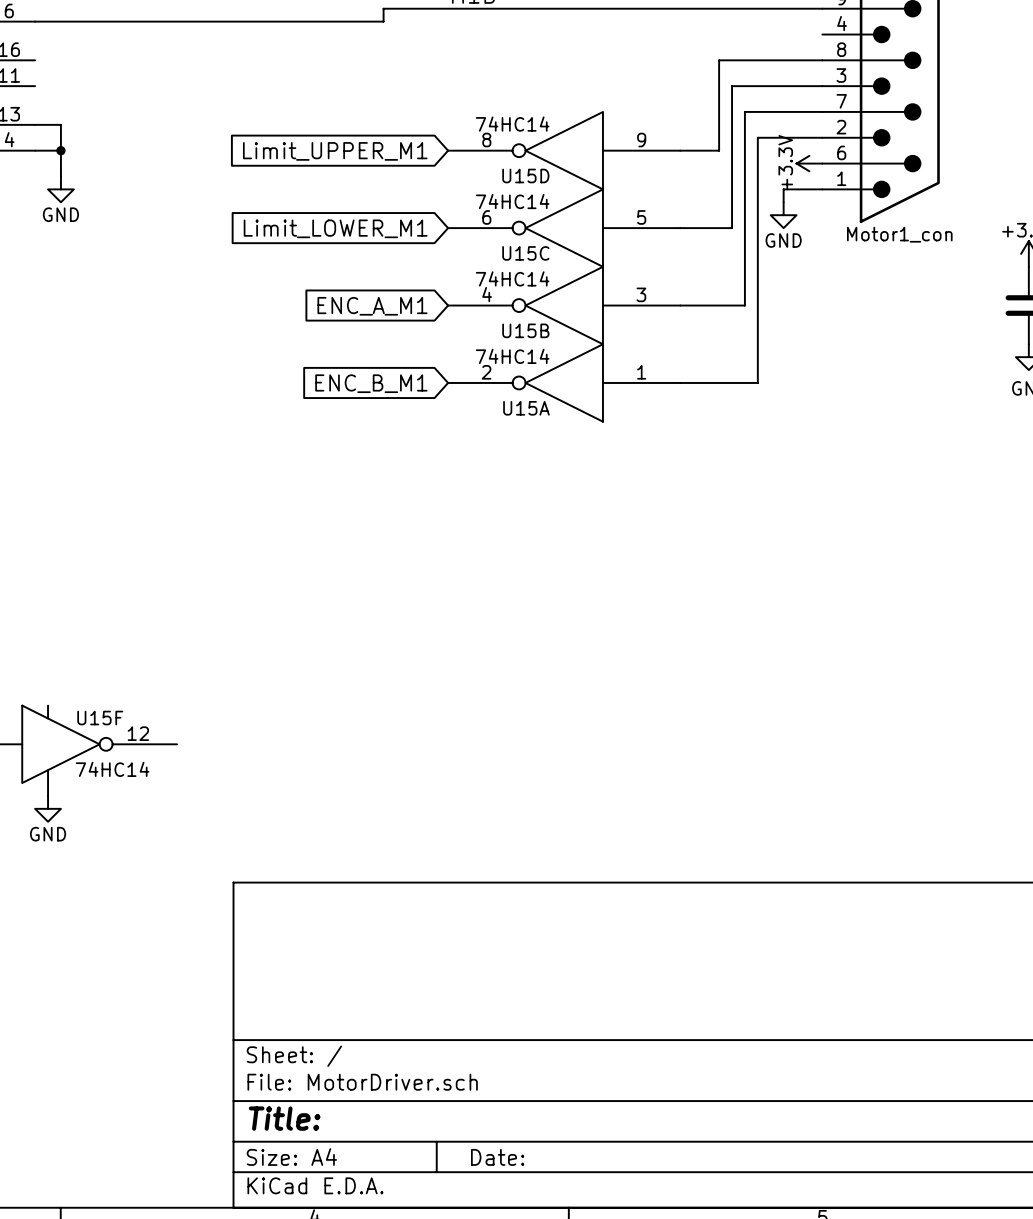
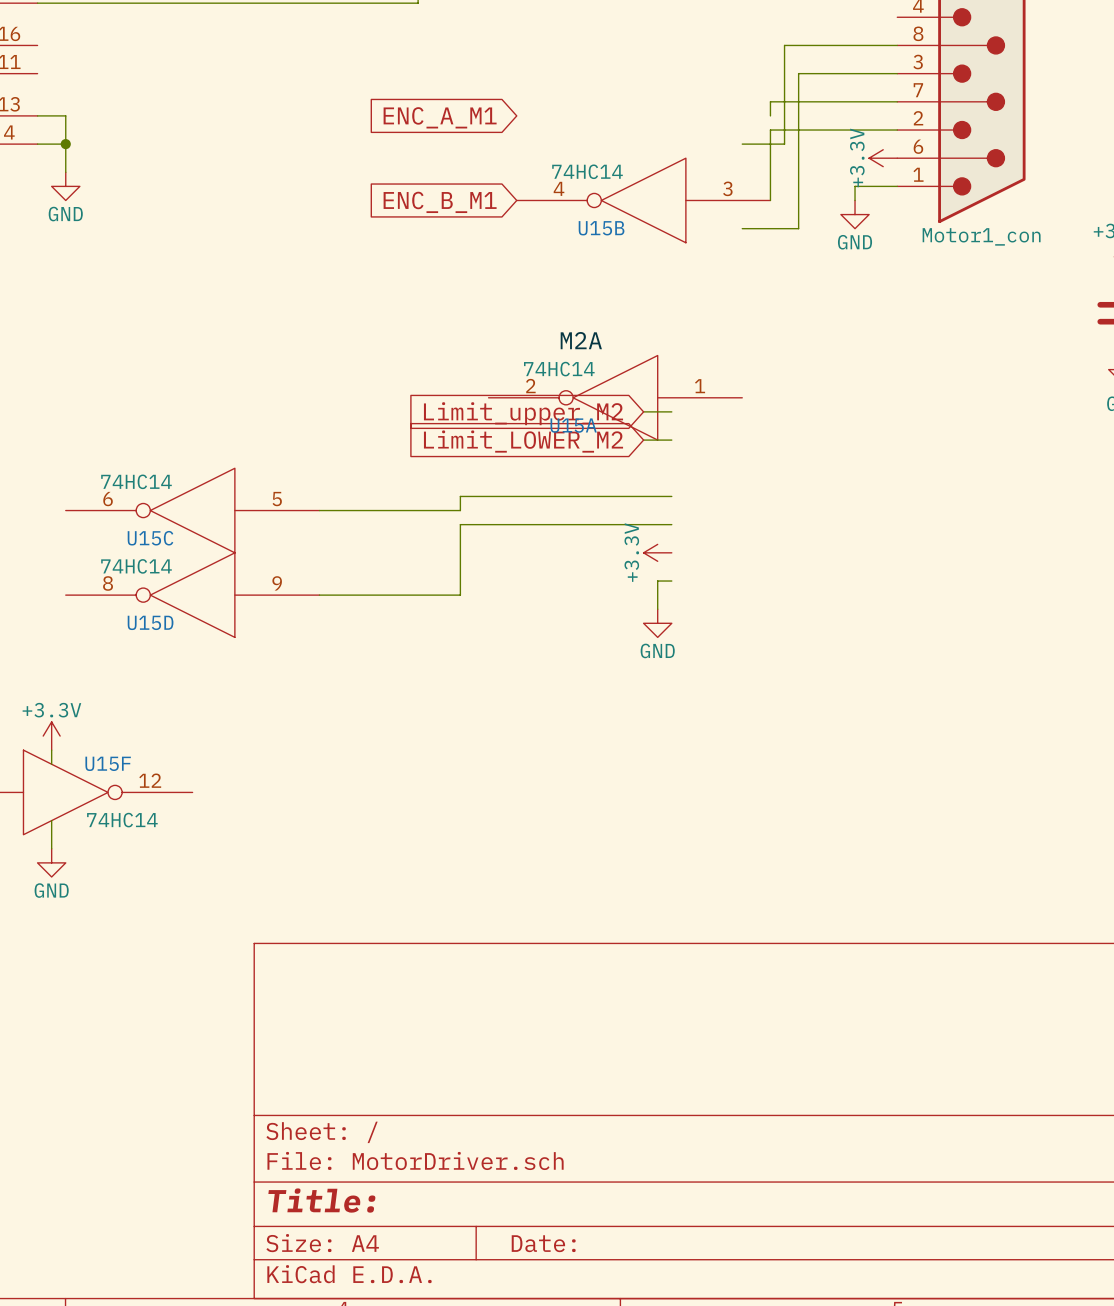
wire: (744, 111) (744, 305) (680, 305) -> (812, 101) (770, 101) (770, 115)
wire: (757, 137) (757, 382) (680, 382) -> (826, 130) (770, 130) (770, 200)
U15D position: (564, 150) -> (192, 595)
global label: Limit_UPPER_M1 (335, 151) -> none
global label: Limit_LOWER_M1 (335, 228) -> none
U15C position: (564, 228) -> (192, 510)
U15B position: (564, 305) -> (643, 200)
global label position: ENC_A_M1 (372, 306) -> ENC_A_M1 (440, 117)
label: none -> M2A (581, 340)
global label position: ENC_B_M1 (371, 383) -> ENC_B_M1 (440, 202)
wire: none -> (643, 411) (671, 411)
global label: none -> Limit_upper_M2 (523, 413)
wire: none -> (643, 440) (671, 440)
global label: none -> Limit_LOWER_M2 (523, 441)
wire: none -> (671, 496) (460, 496) (460, 510) (319, 510)
wire: none -> (671, 524) (460, 524) (460, 595) (319, 595)
power symbol: none -> +3.3V (657, 552)
wire: none -> (671, 581) (657, 581) (657, 609)
power symbol: none -> GND (657, 623)
power symbol: none -> +3.3V (51, 736)

